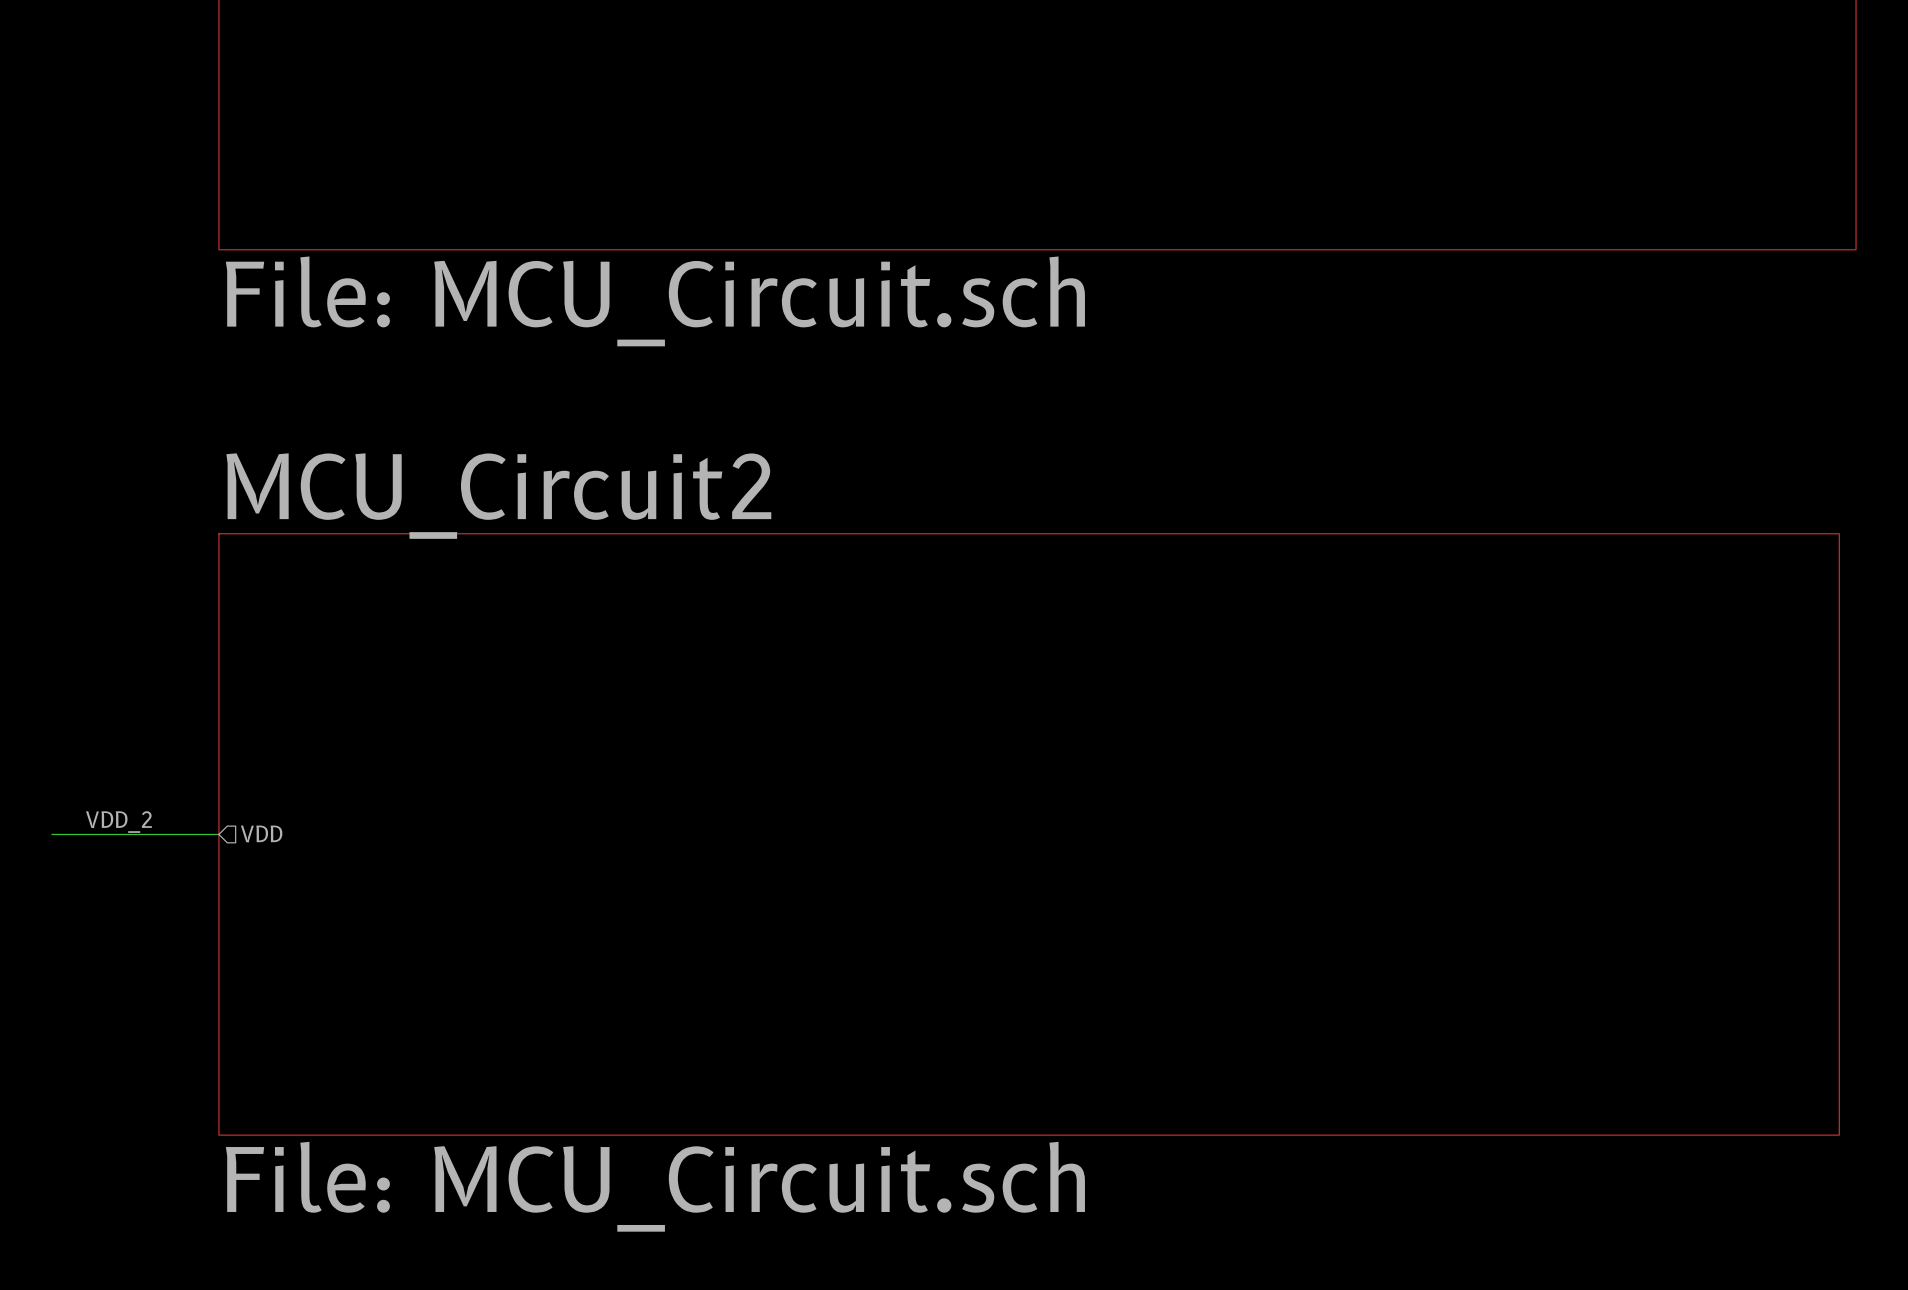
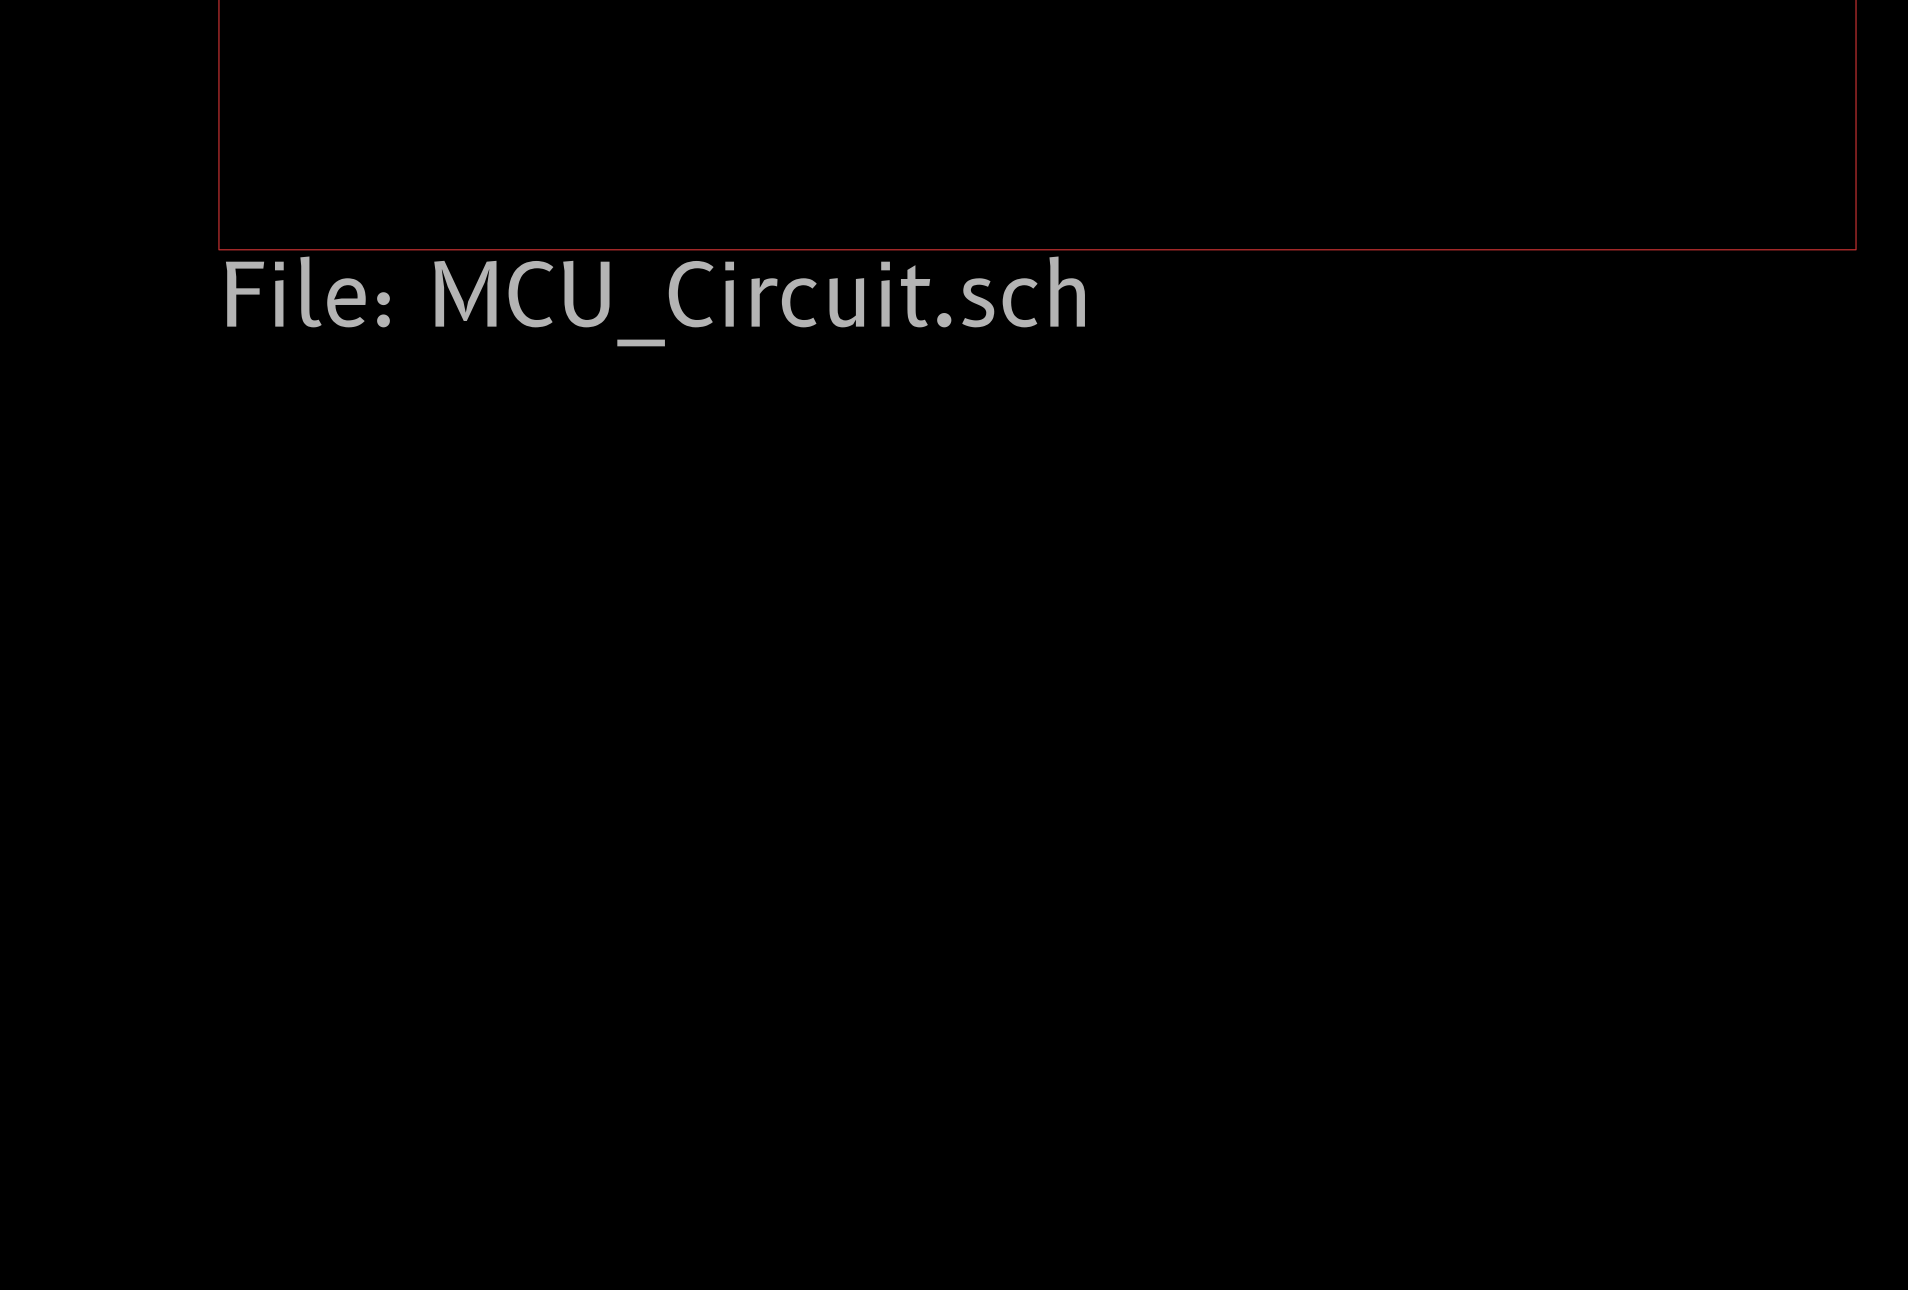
label: VDD_2 (118, 822) -> none
sheet pin: VDD (261, 833) -> none
wire: (51, 834) (218, 834) -> none
sheet MCU_Circuit2: File: MCU_Circuit.sch (1029, 834) -> none

